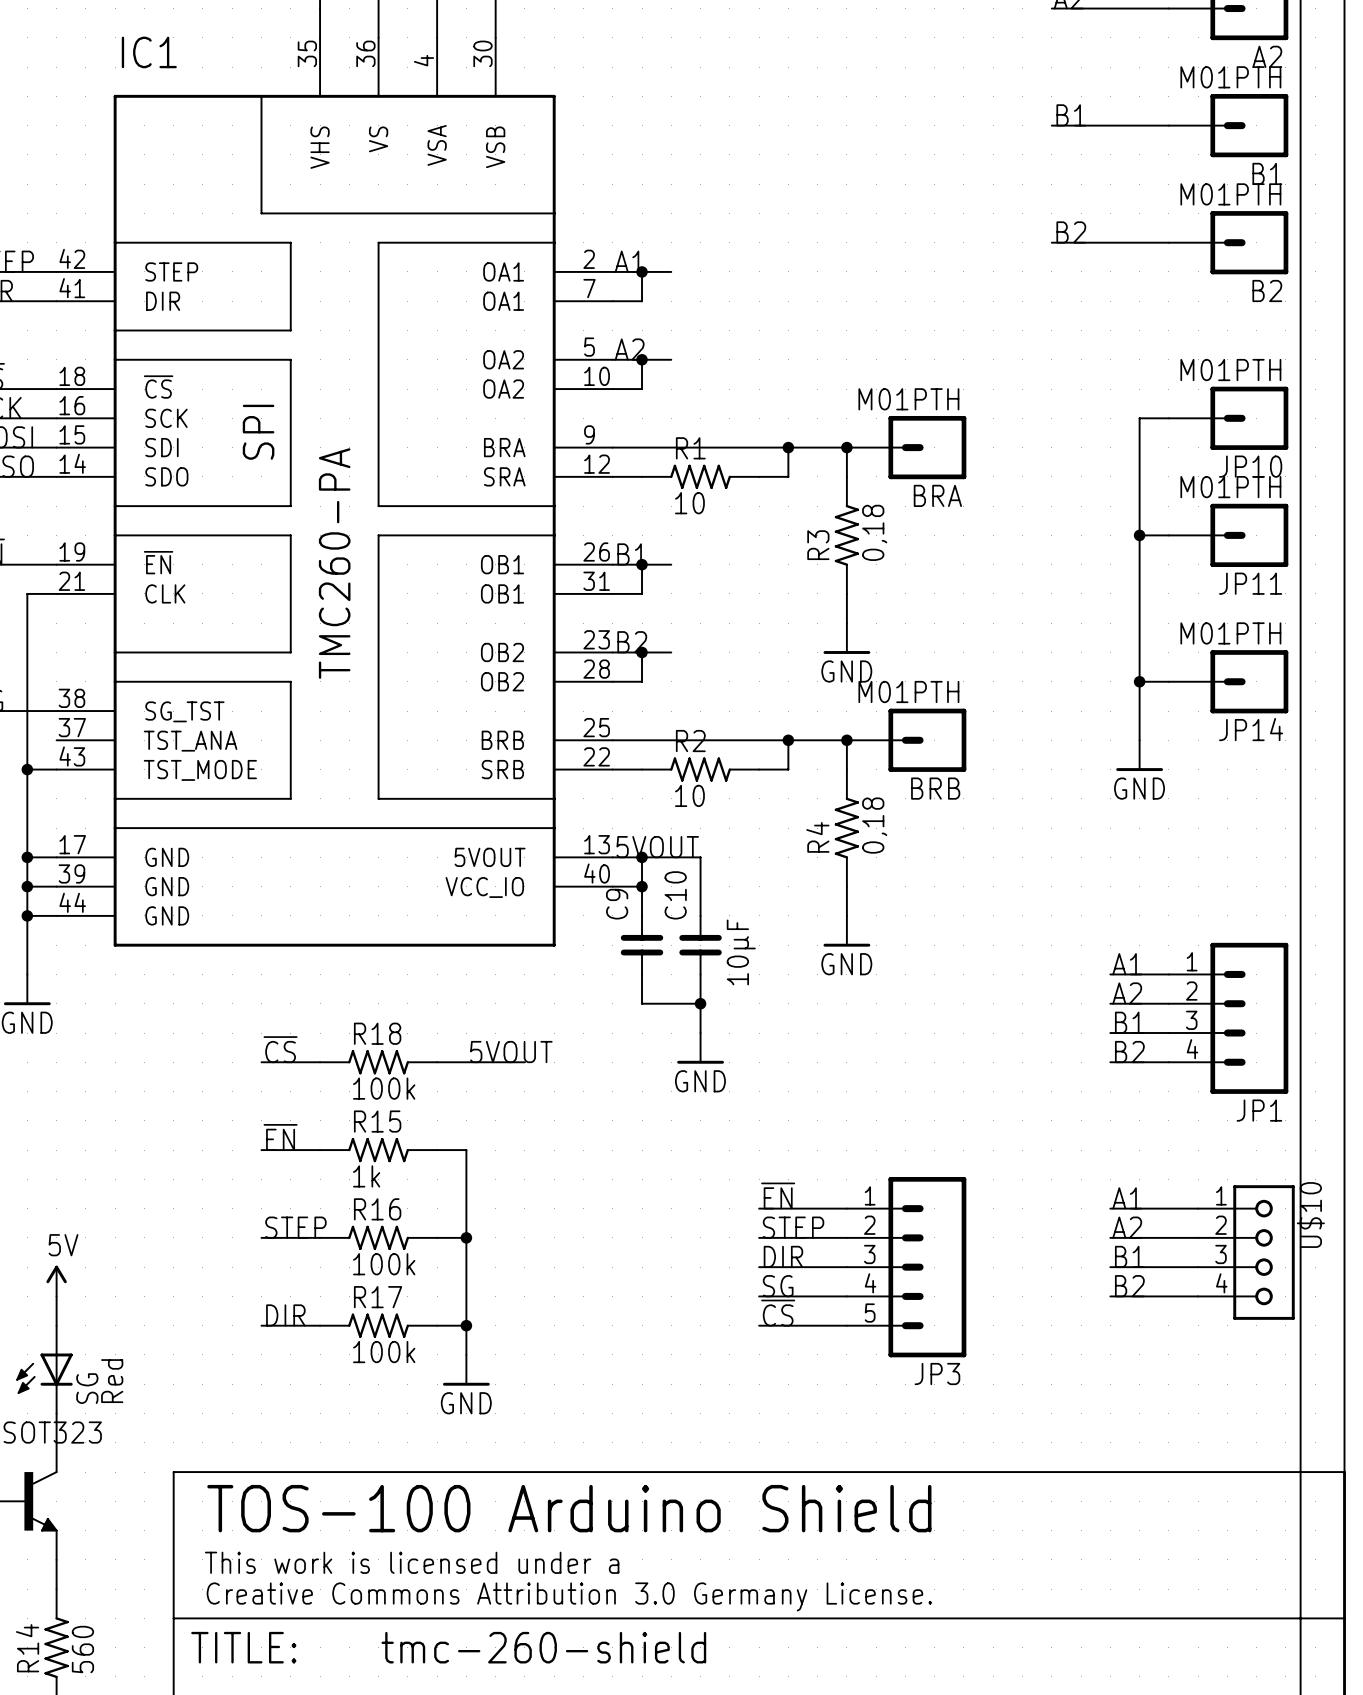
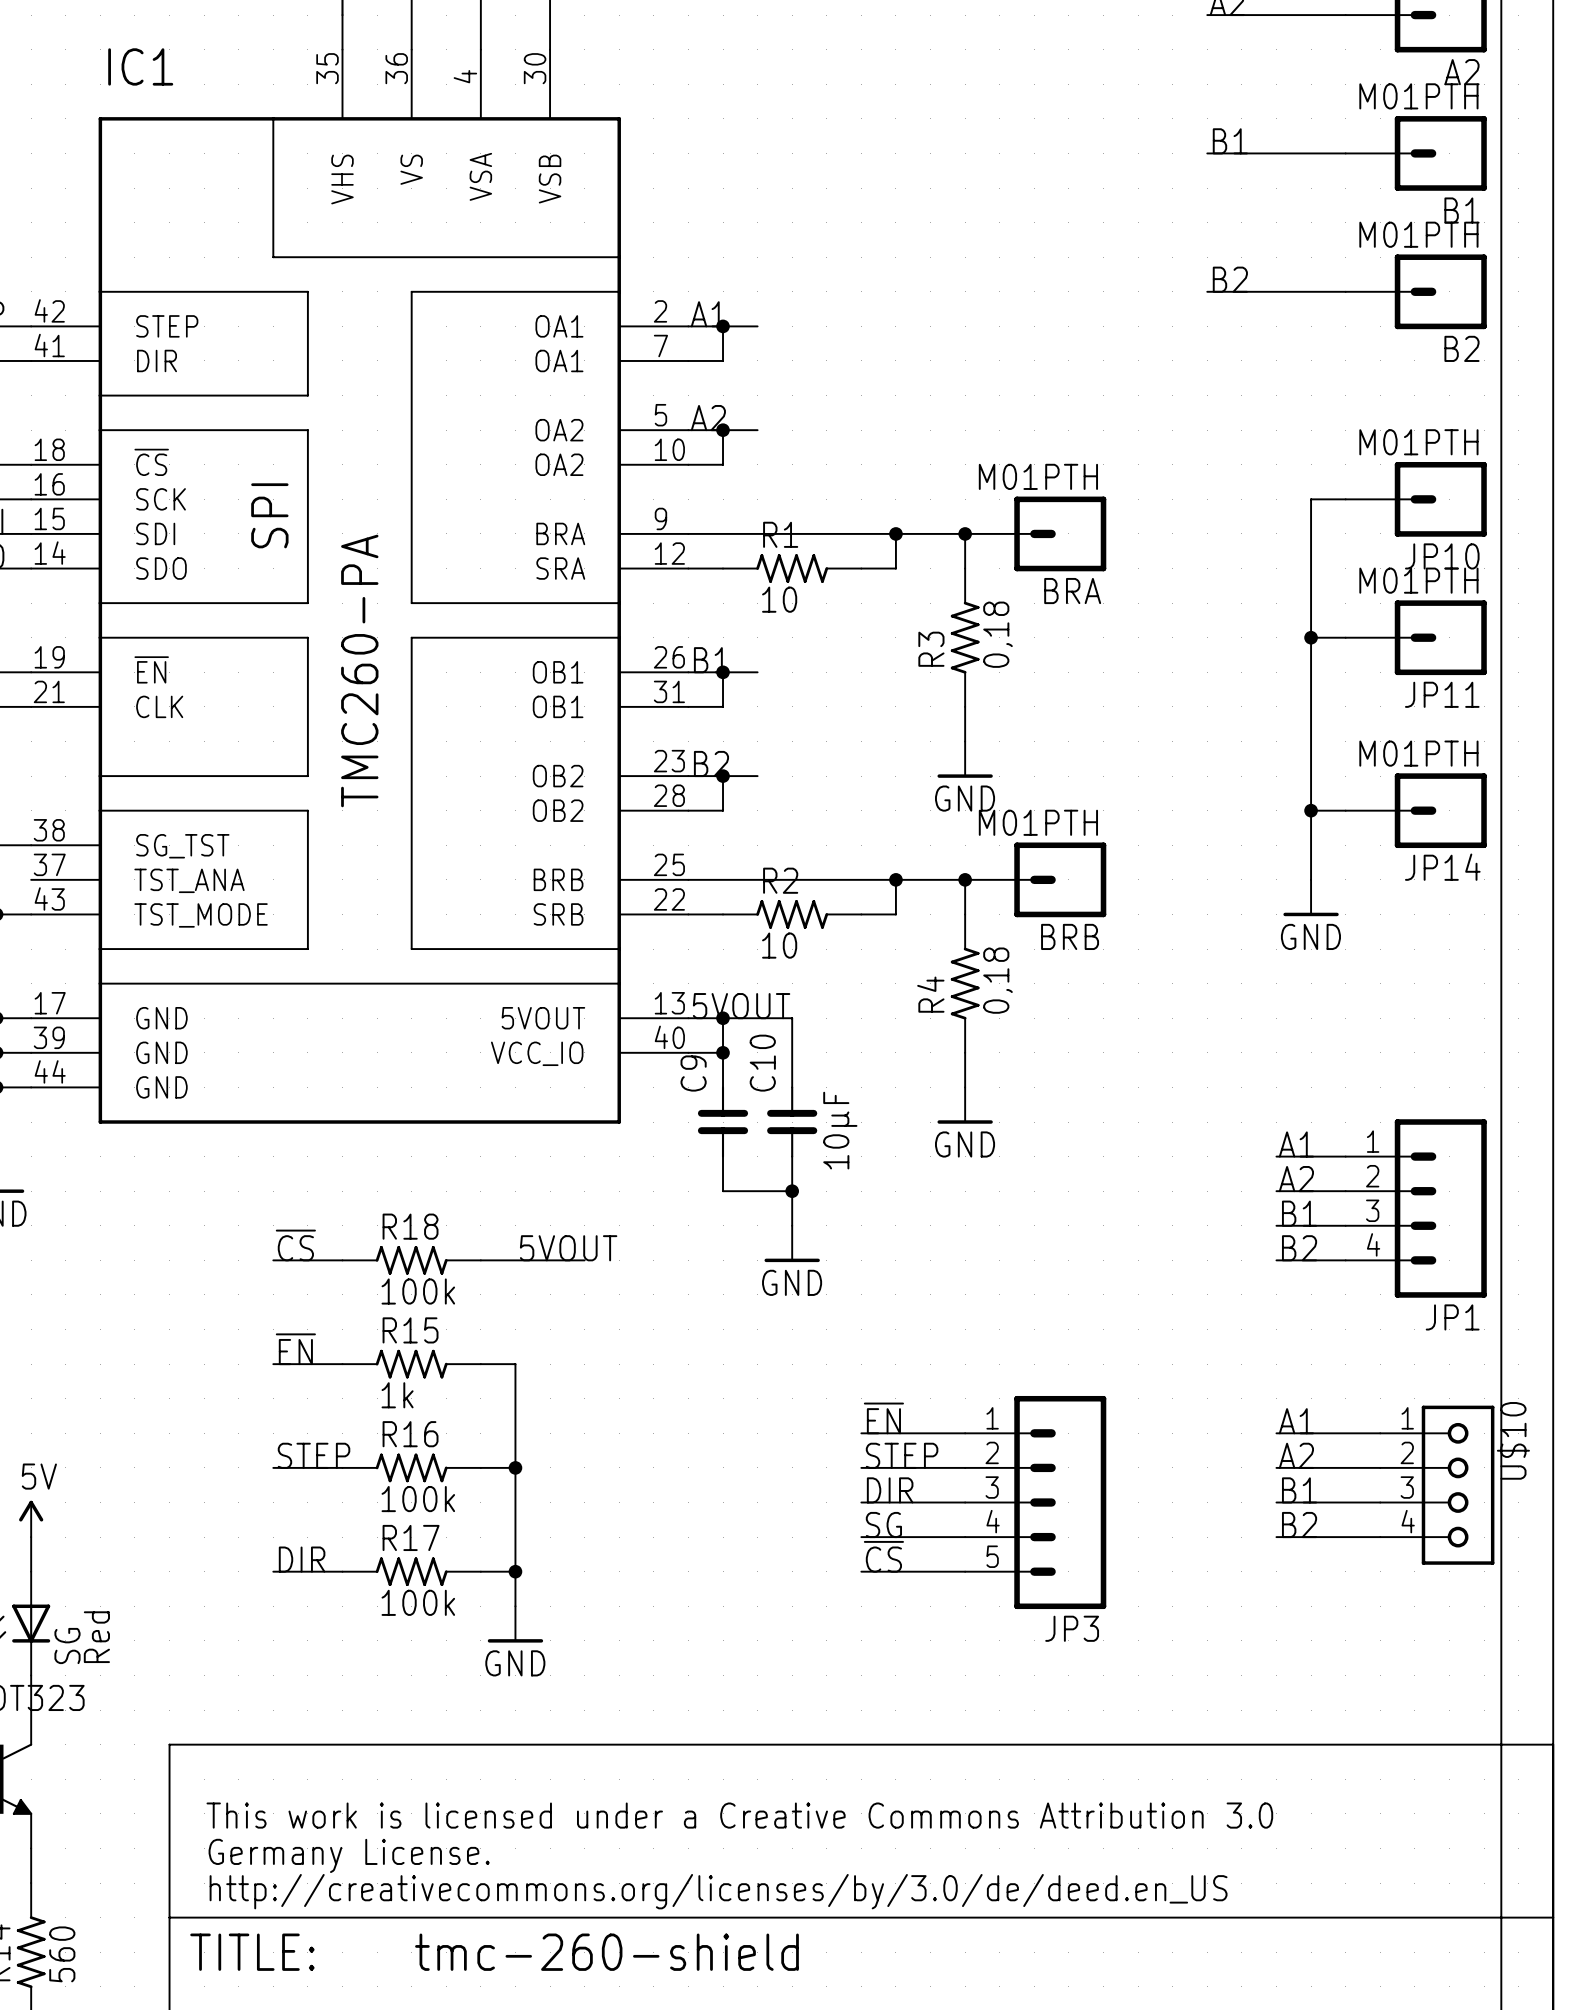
text: TOS-100 Arduino Shield (569, 1508) -> This work is licensed under a Creative Commons Attribution 3.0 (739, 1815)
text: This work is licensed under a (412, 1562) -> Germany License. (349, 1855)
text: Creative Commons Attribution 3.0 Germany License. (569, 1596) -> http://creativecommons.org/licenses/by/3.0/de/deed.en_US (718, 1891)

